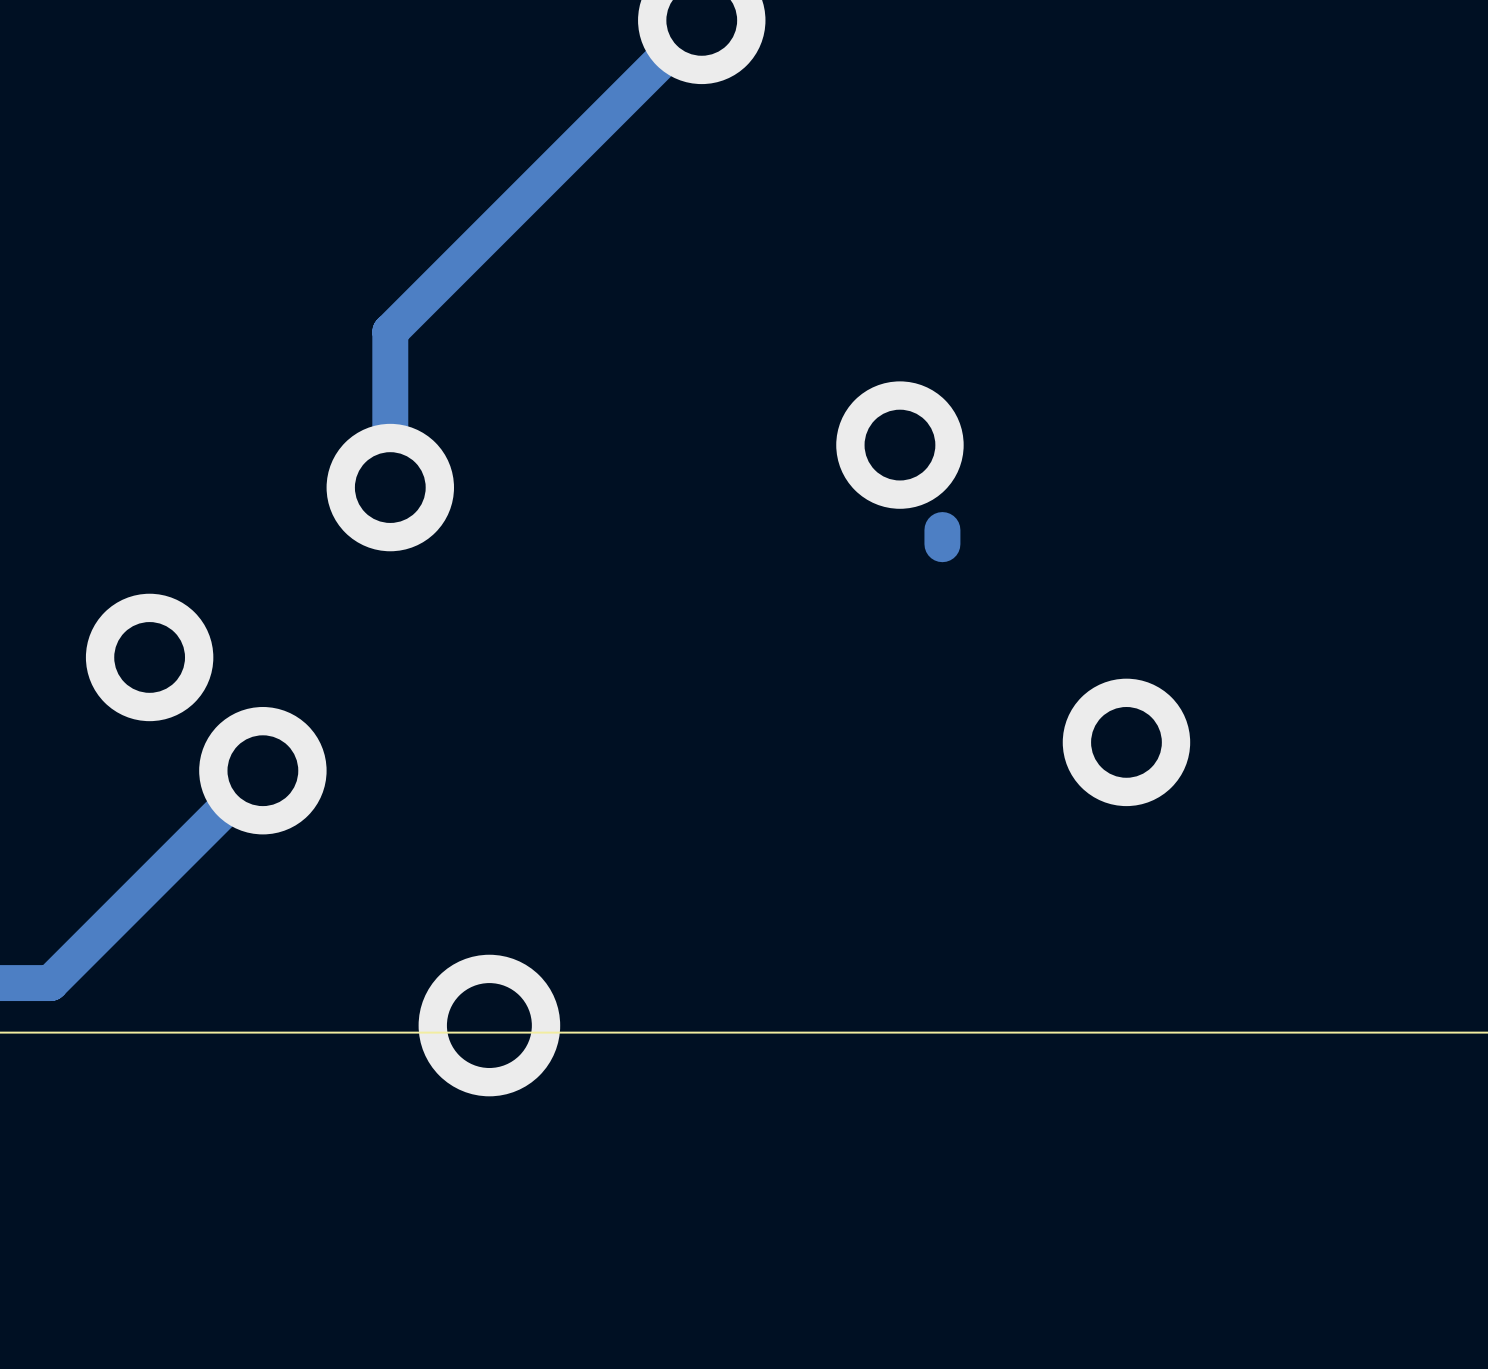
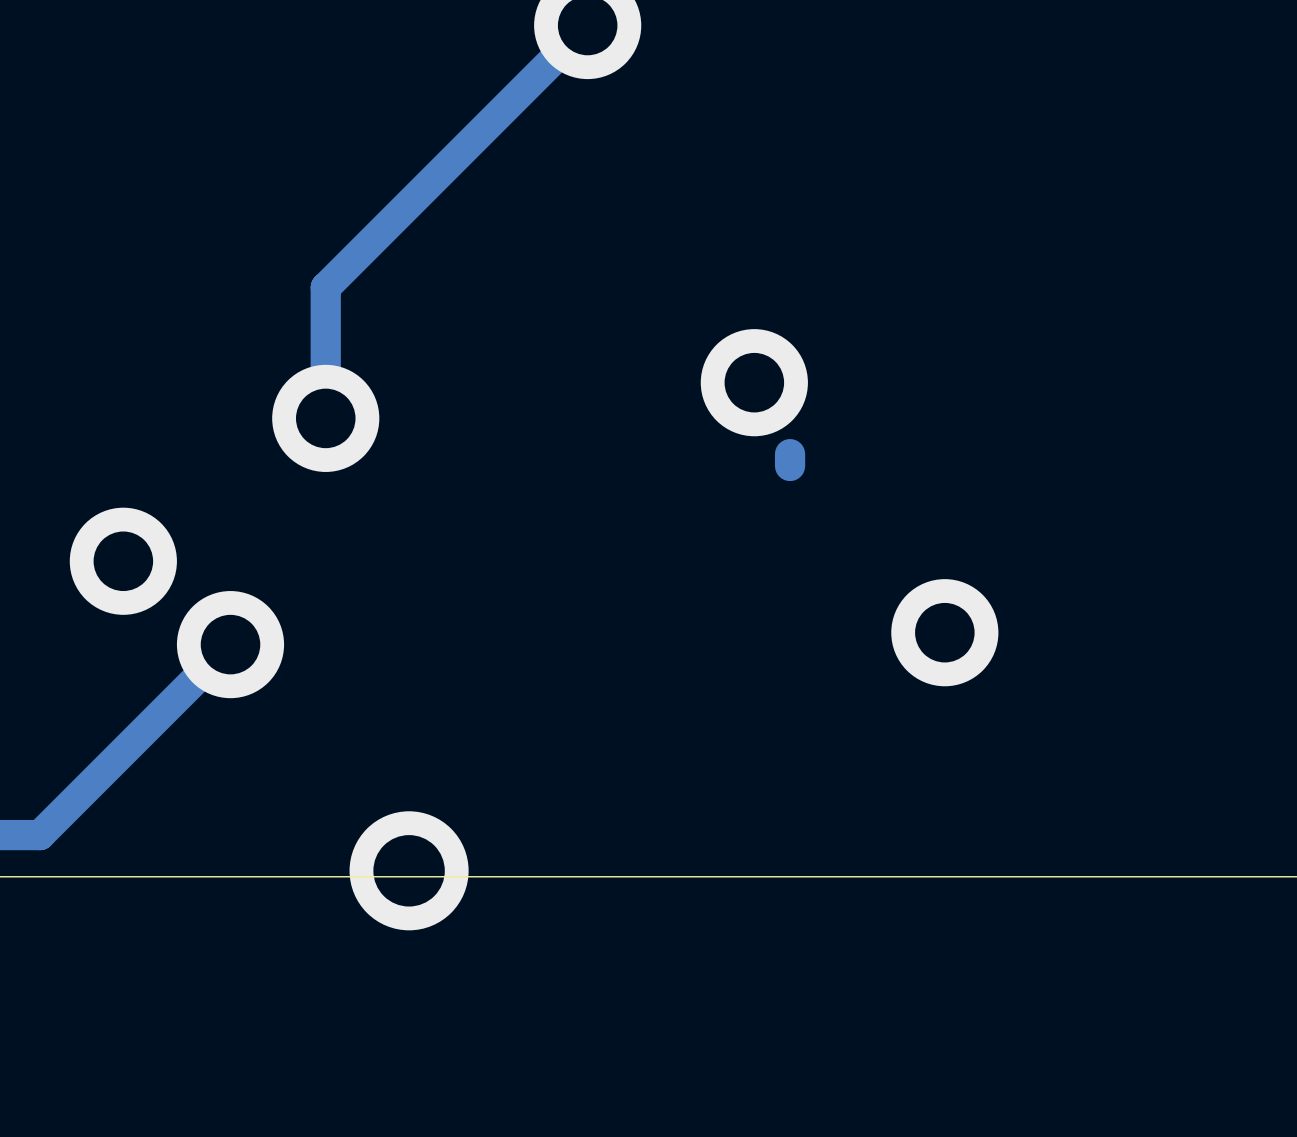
via position: (262, 770) -> (230, 644)

